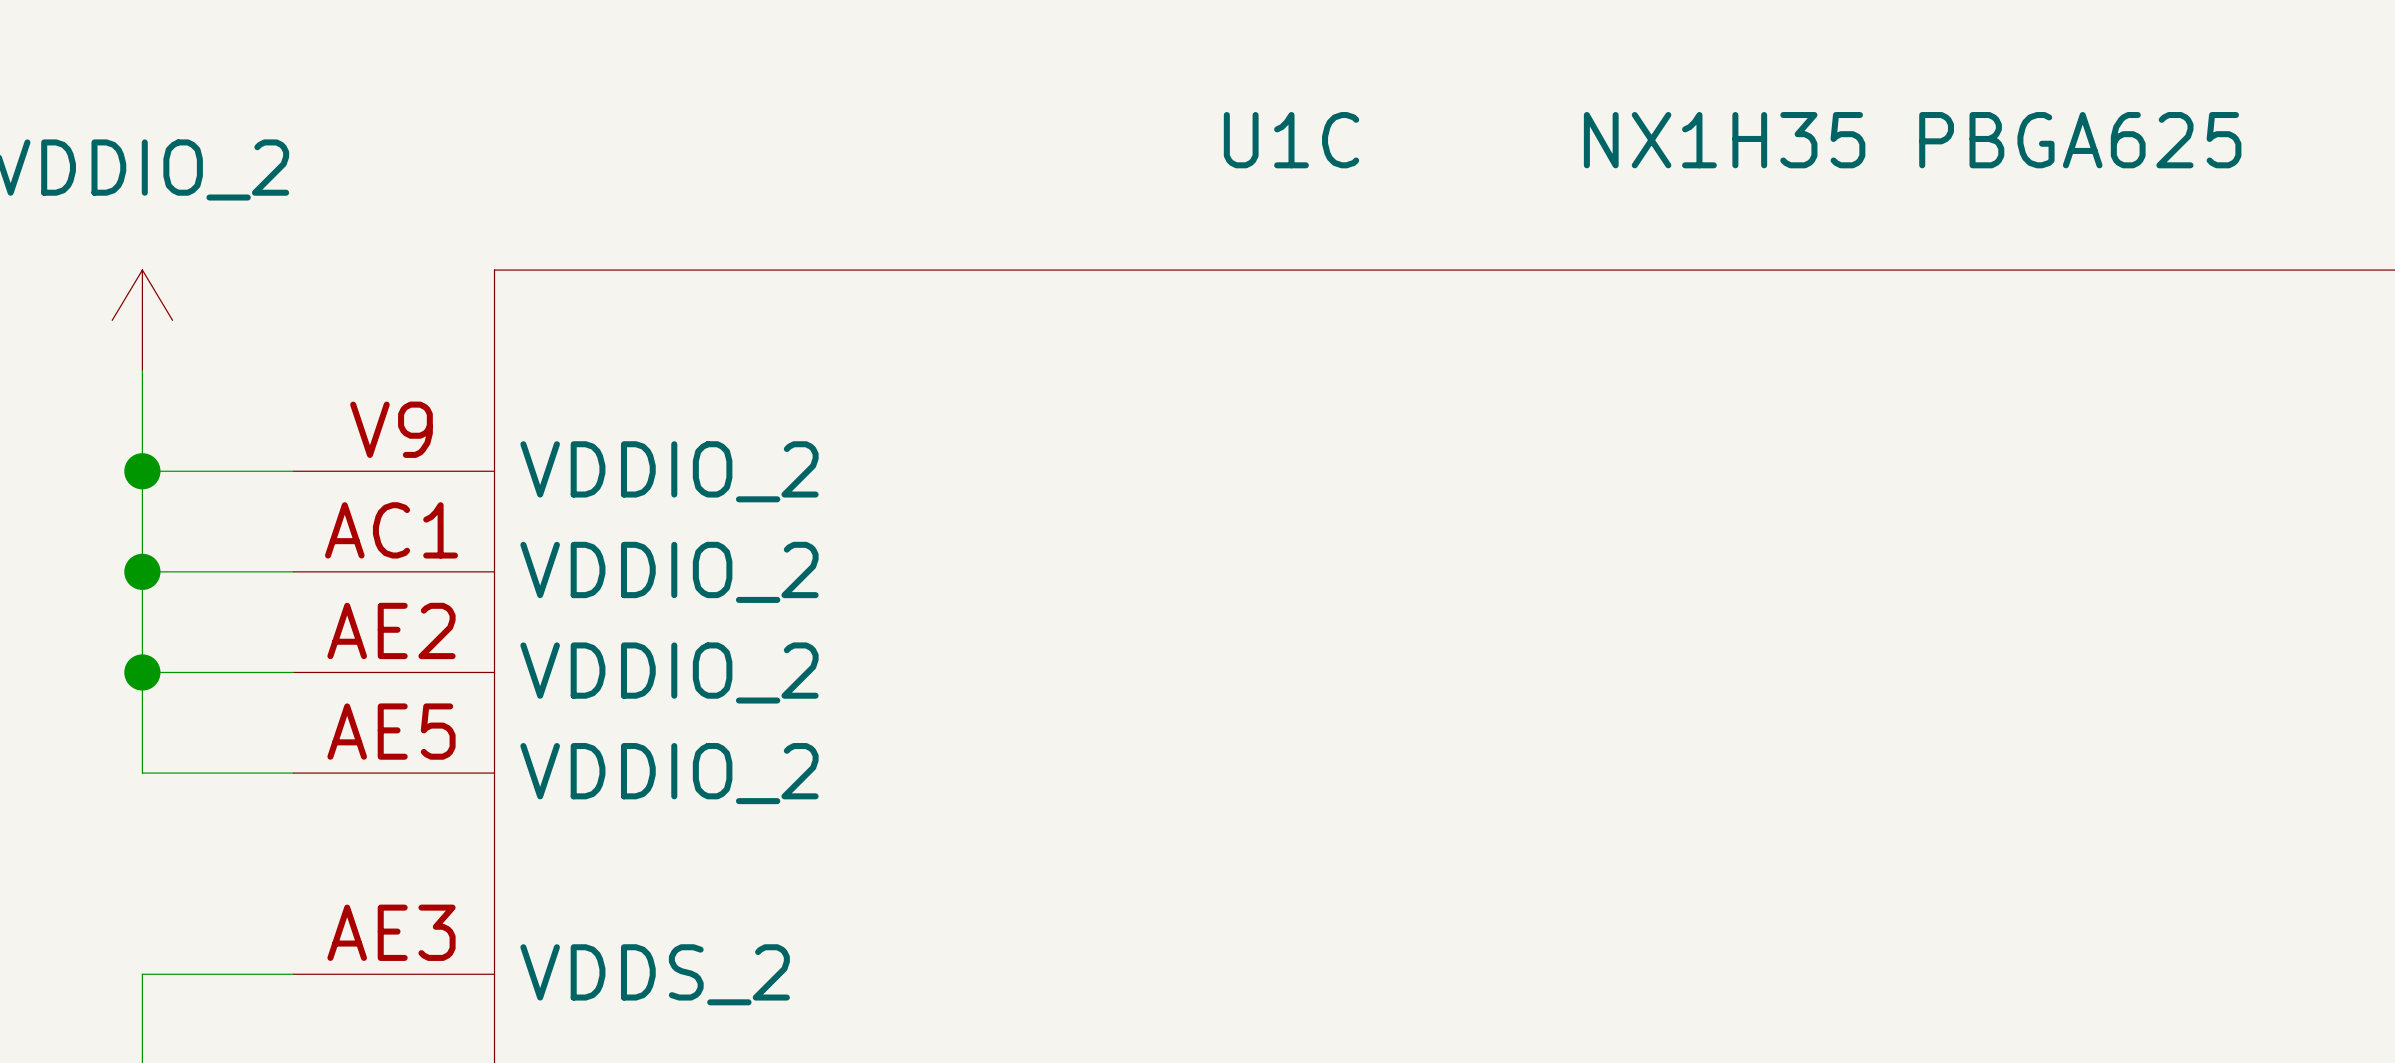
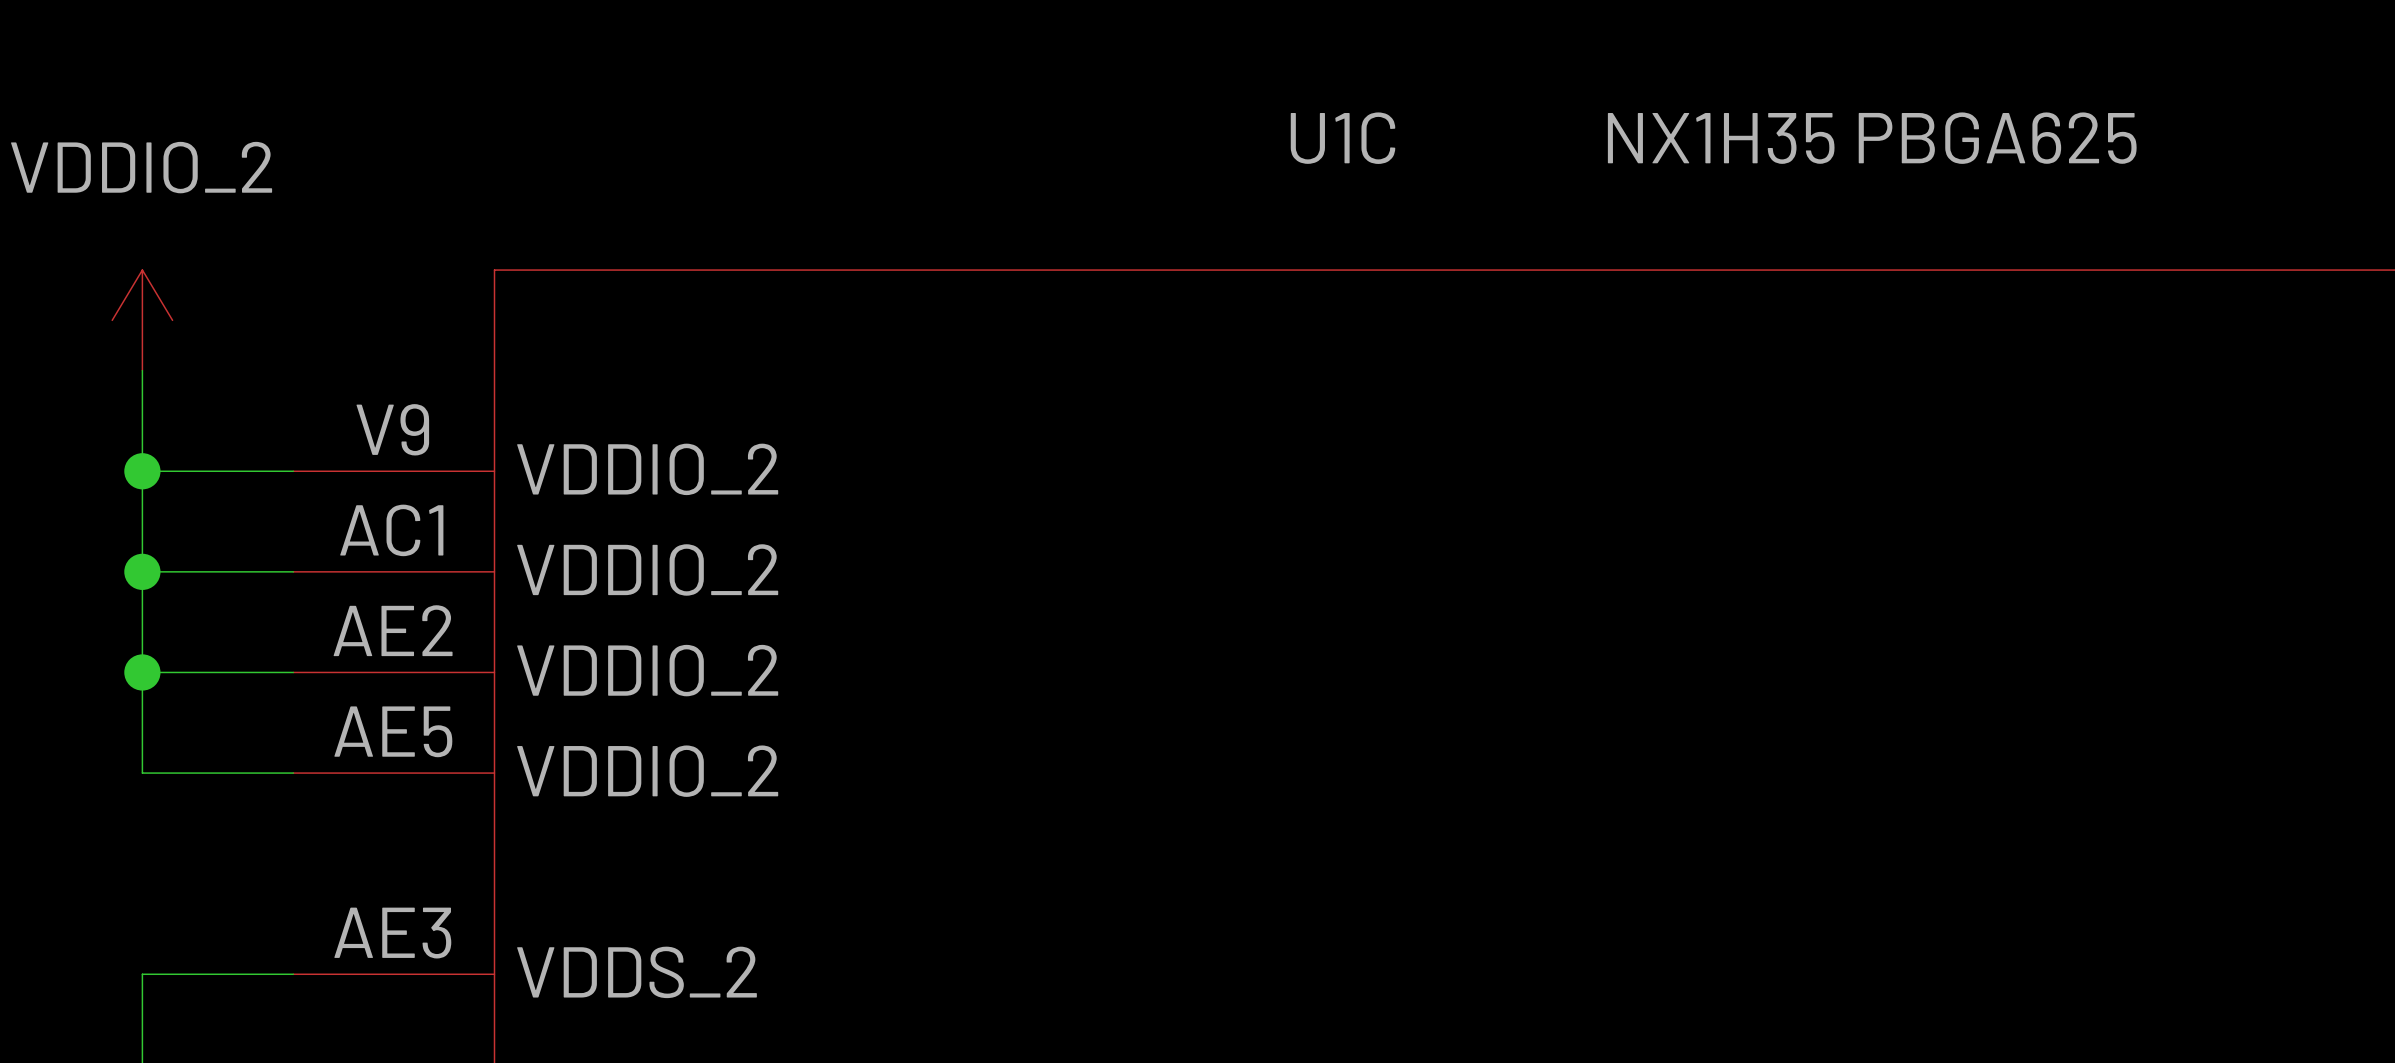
U1C name position: U1C (1291, 140) -> U1C (1343, 138)
U1C value position: NX1H35 PBGA625 (1912, 140) -> NX1H35 PBGA625 (1872, 138)

